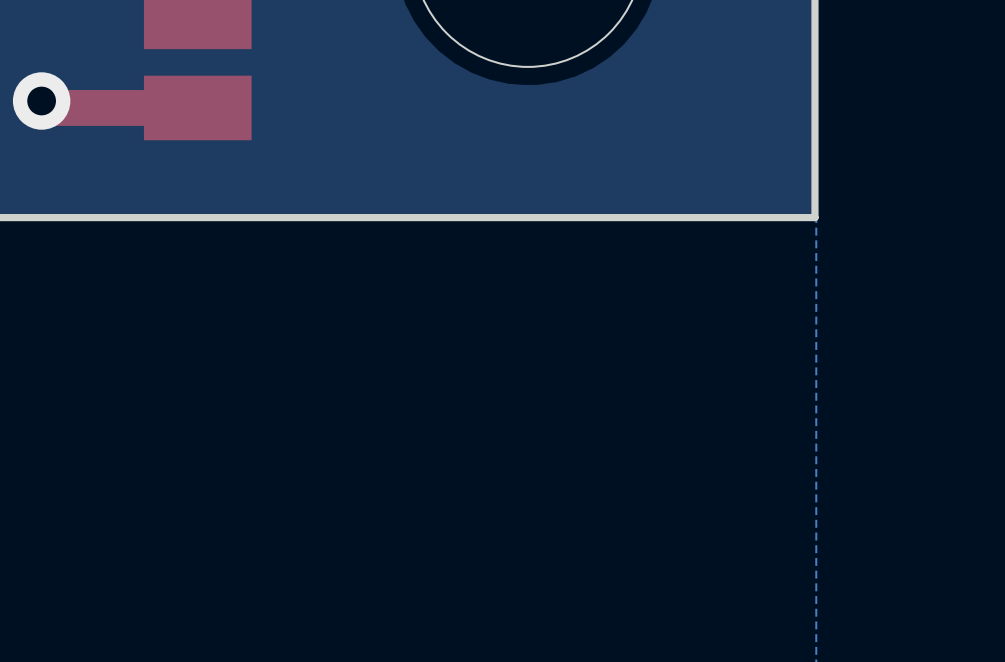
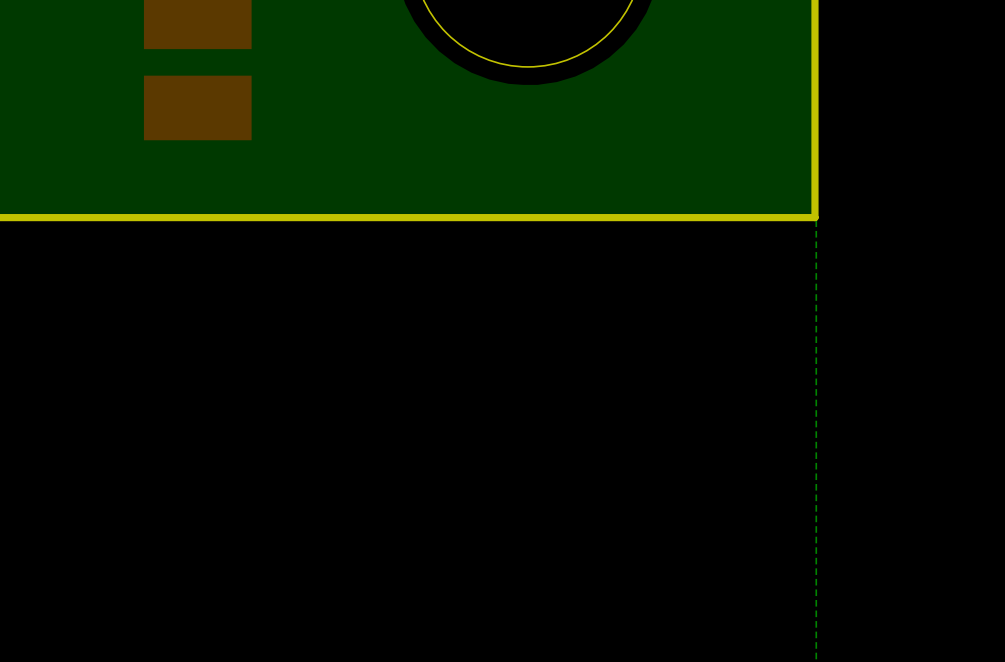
top track: (41, 101) (48, 107) (197, 107) -> none
via: (41, 101) -> none

